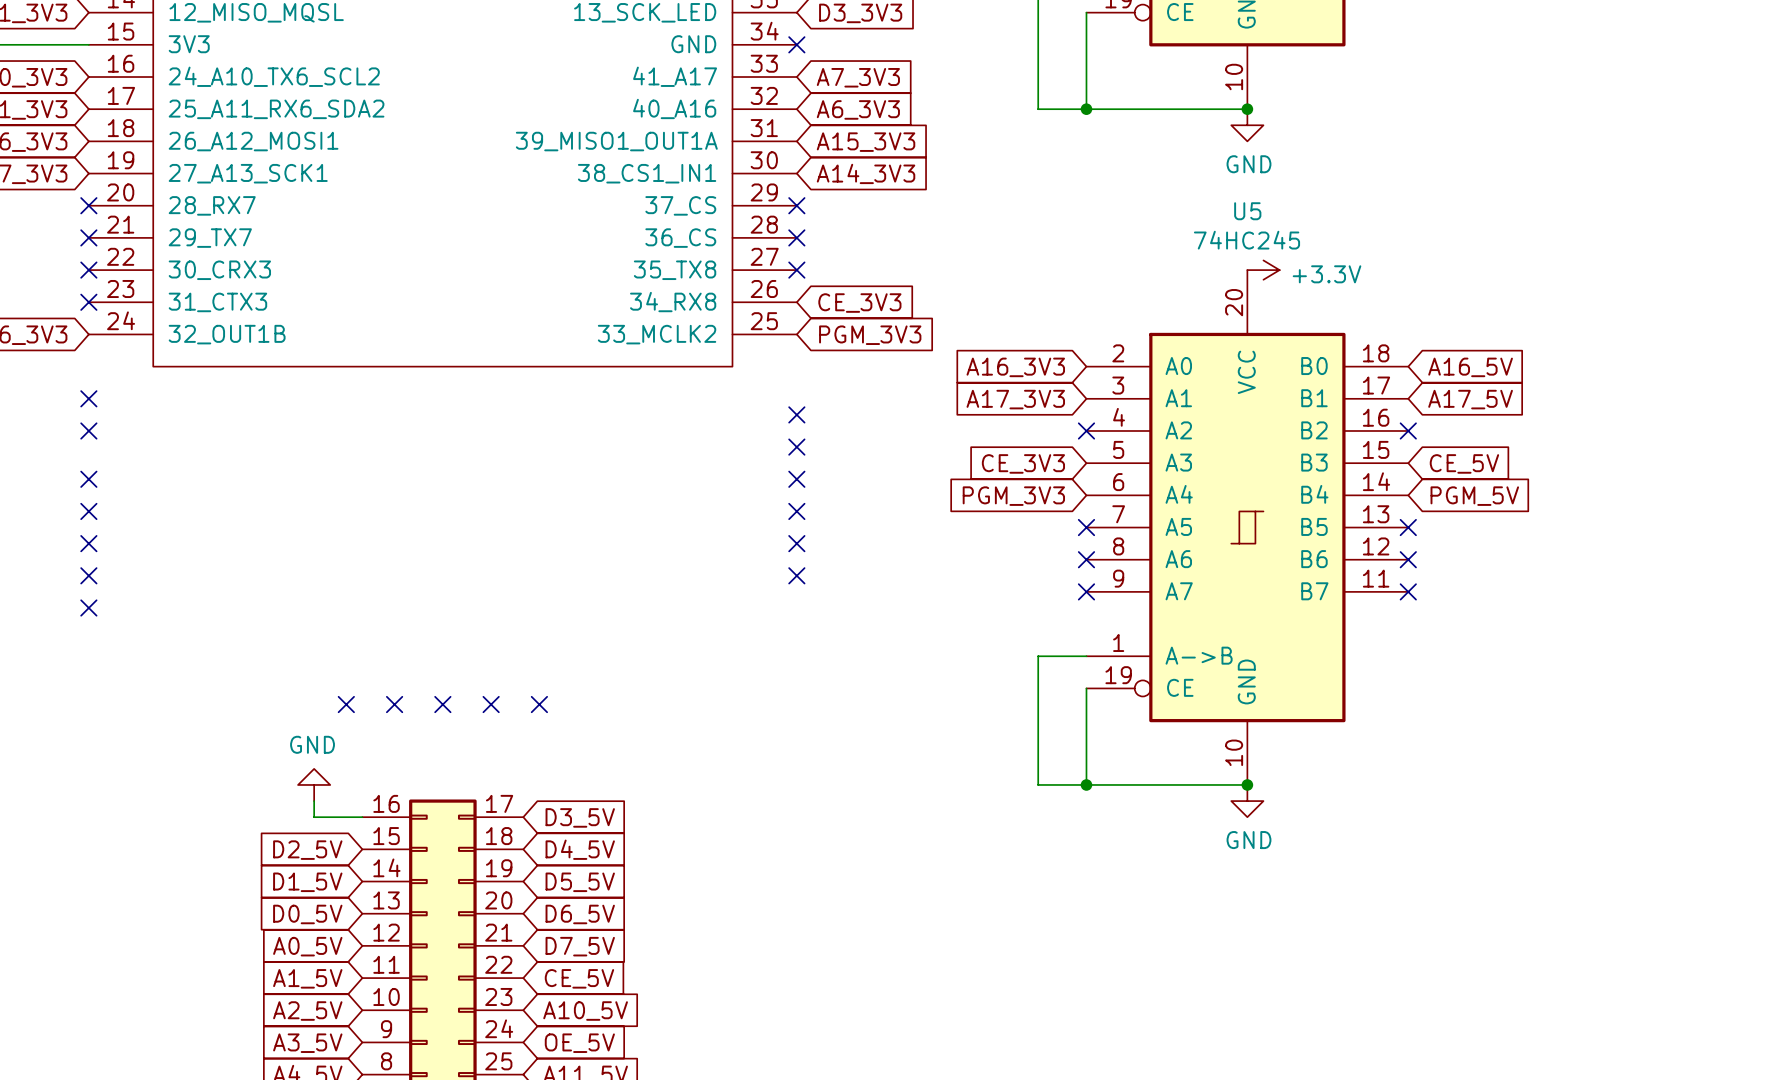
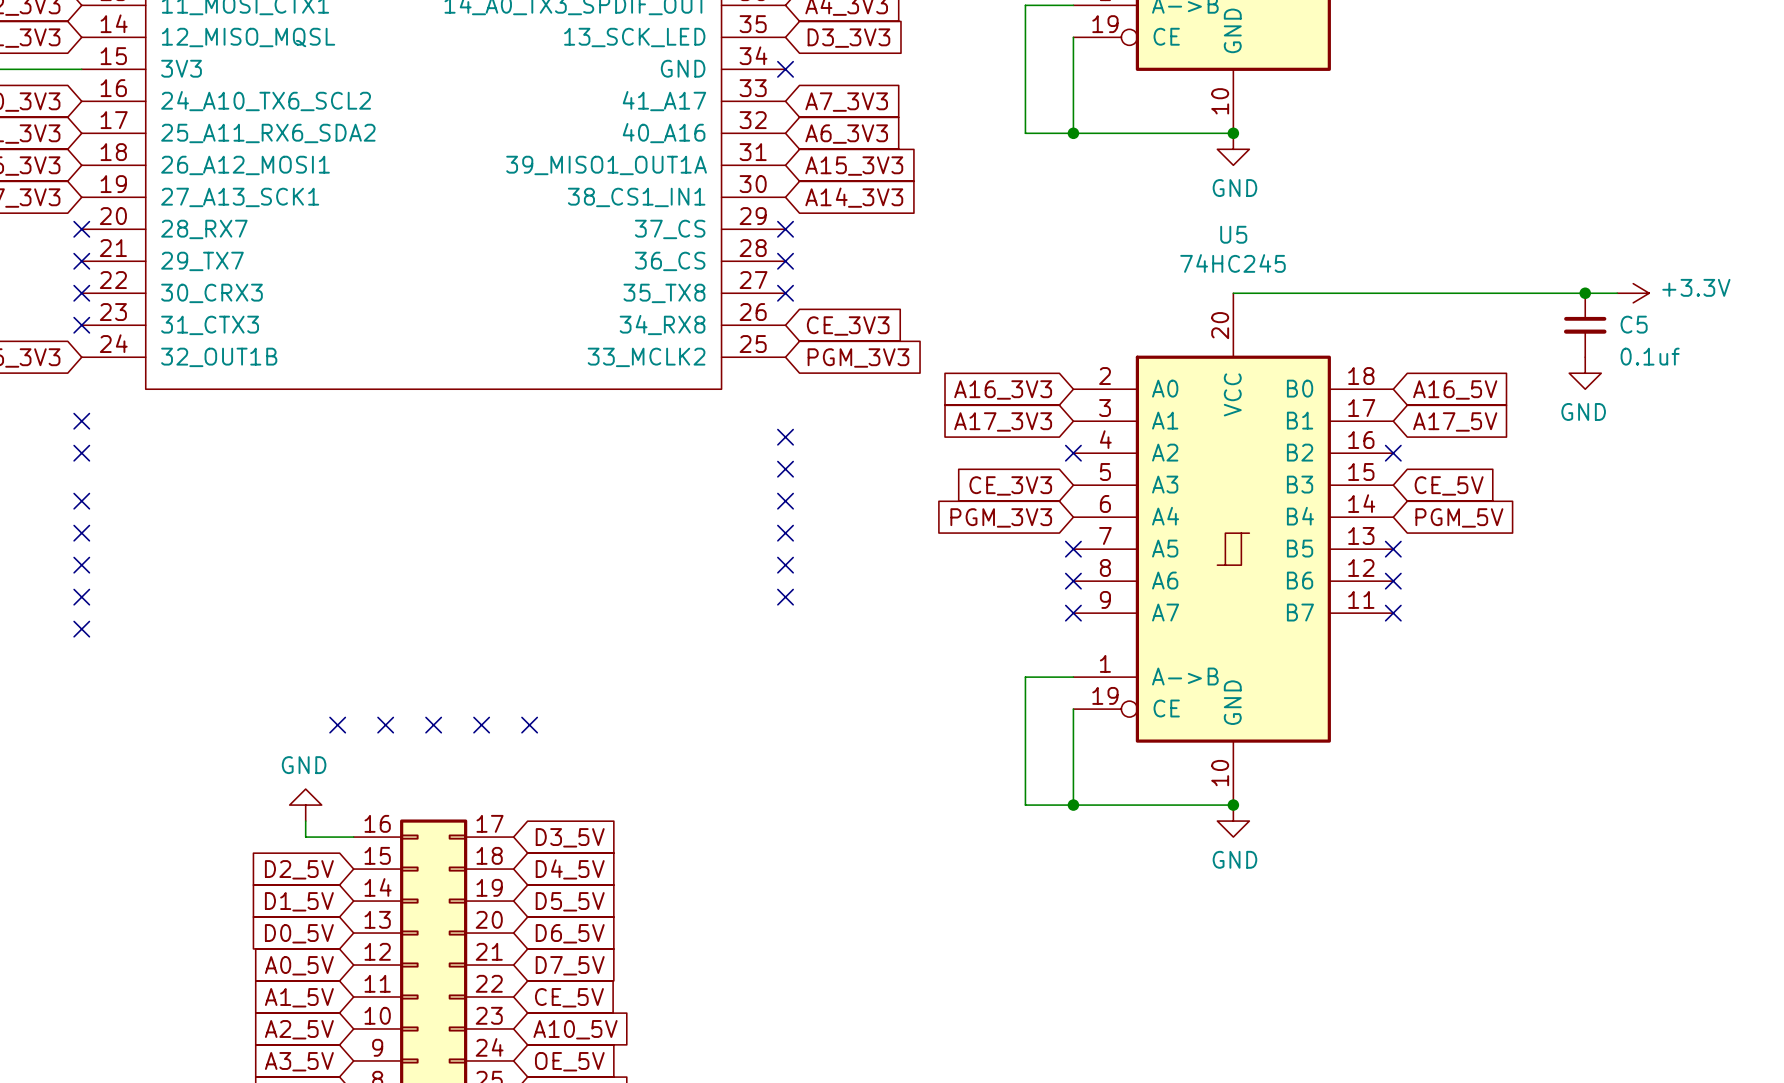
wire: none -> (1233, 293) (1617, 293)
power symbol: +3.3V (1263, 270) -> none
junction: none -> (1585, 293)
power symbol: none -> +3.3V (1633, 293)
C5: none -> 0.1uf (1585, 325)
power symbol: none -> GND (1585, 373)

